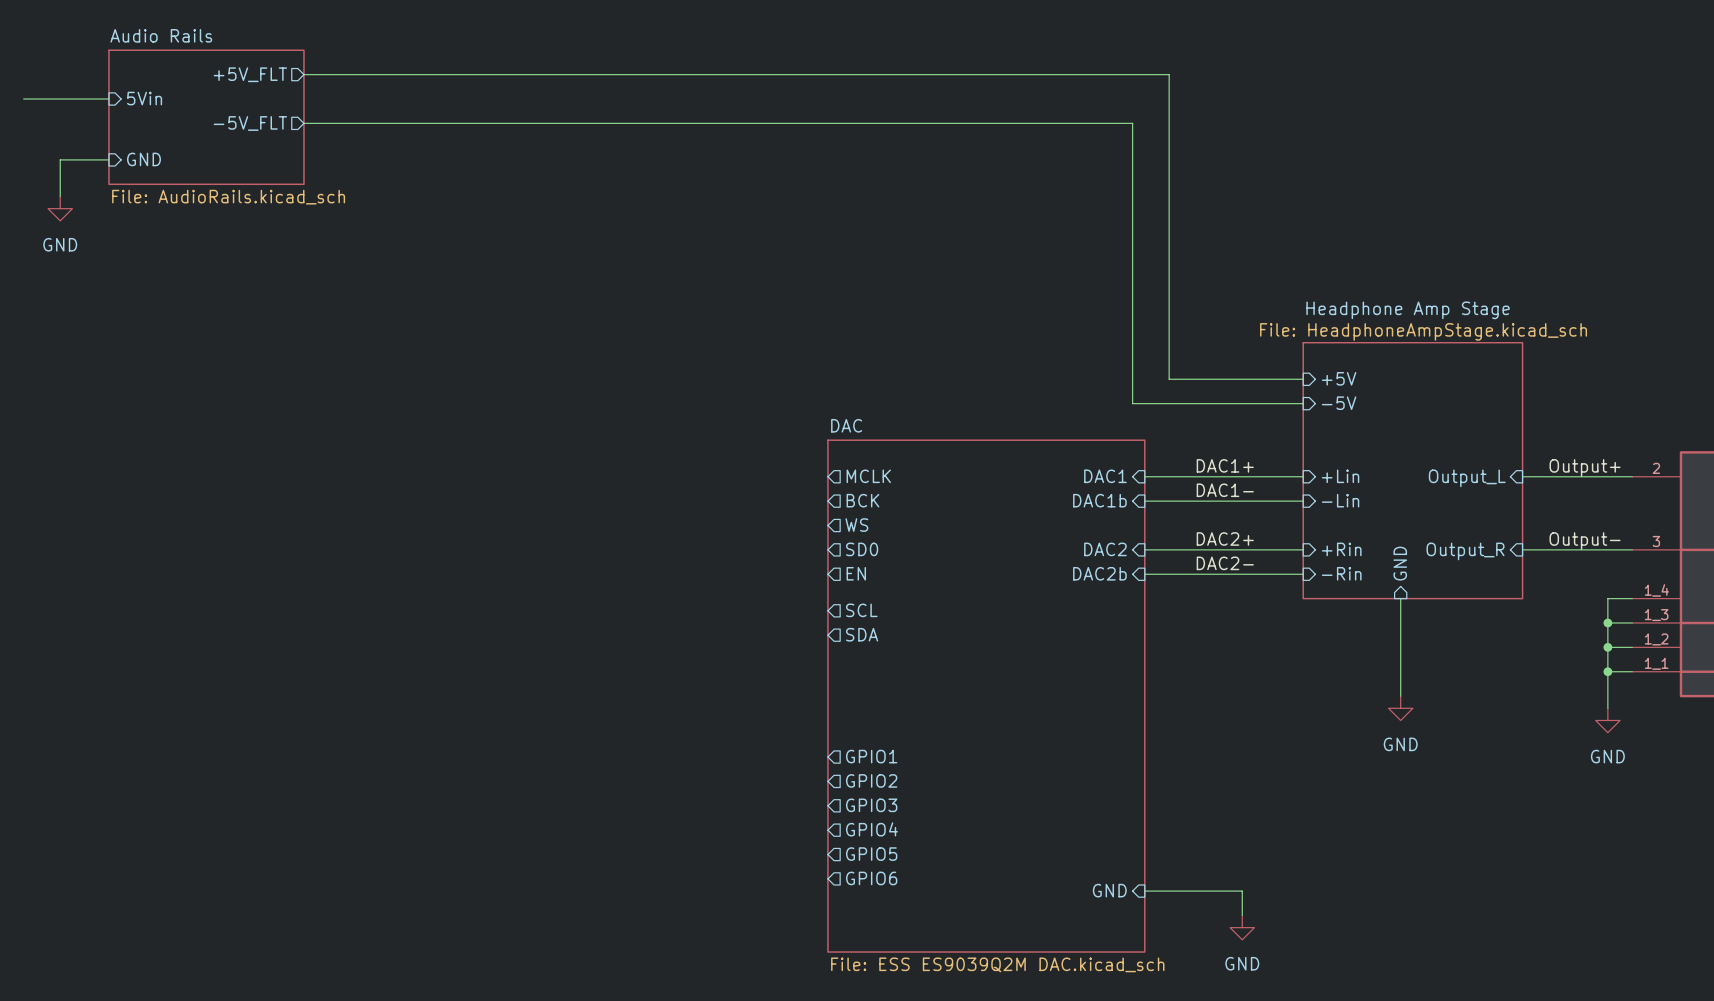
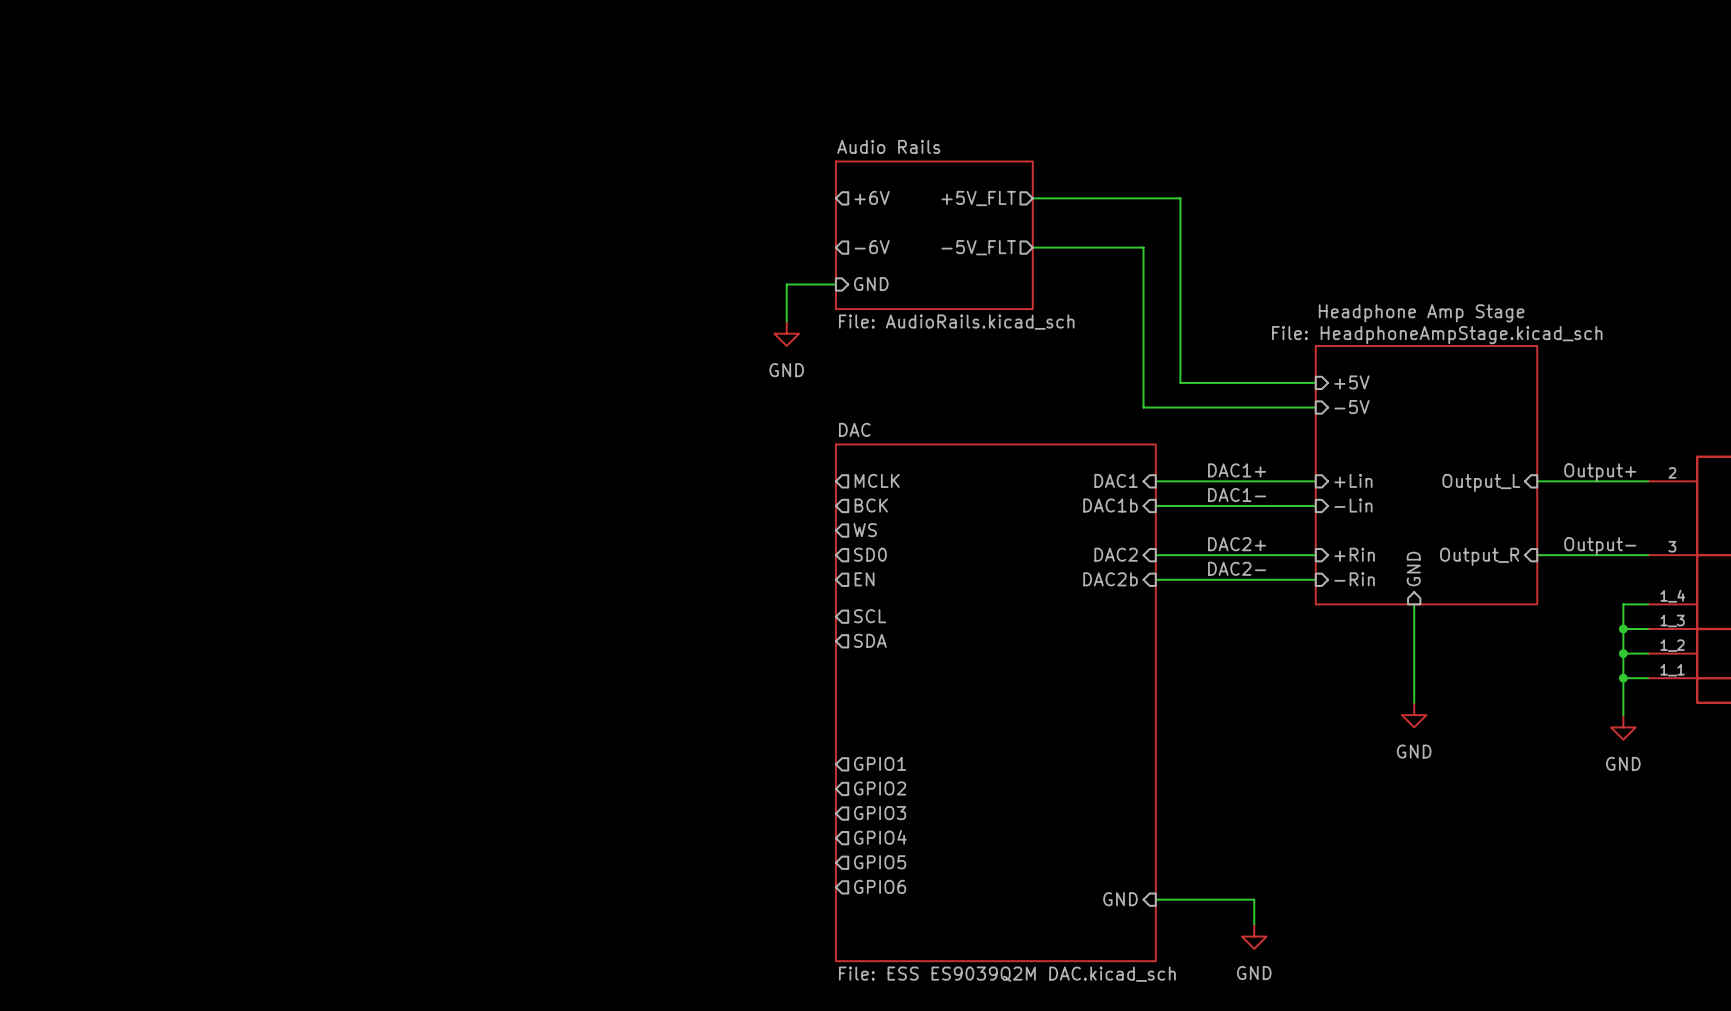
sheet pin: +5V_FLT (250, 74) -> none
wire: (303, 74) (1169, 74) (1169, 196) -> (1032, 198) (1180, 198)
wire: (23, 98) (108, 98) -> none
sheet pin: 5Vin (144, 98) -> none
sheet Audio Rails: File: AudioRails.kicad_sch (206, 117) -> none
sheet pin: -5V_FLT (250, 123) -> none
wire: (303, 123) (1132, 123) (1132, 245) -> (1032, 247) (1143, 247)
wire: (108, 159) (60, 159) (60, 196) -> none
sheet pin: GND (143, 159) -> none
sheet pin: none -> +6V (872, 197)
sheet pin: none -> +5V_FLT (978, 198)
power symbol: GND (60, 208) -> none
sheet Audio Rails: none -> File: AudioRails.kicad_sch (934, 235)
sheet pin: none -> -6V (872, 247)
sheet pin: none -> -5V_FLT (978, 247)
wire: none -> (835, 284) (786, 284) (786, 321)
sheet pin: none -> GND (871, 284)
power symbol: none -> GND (786, 333)

